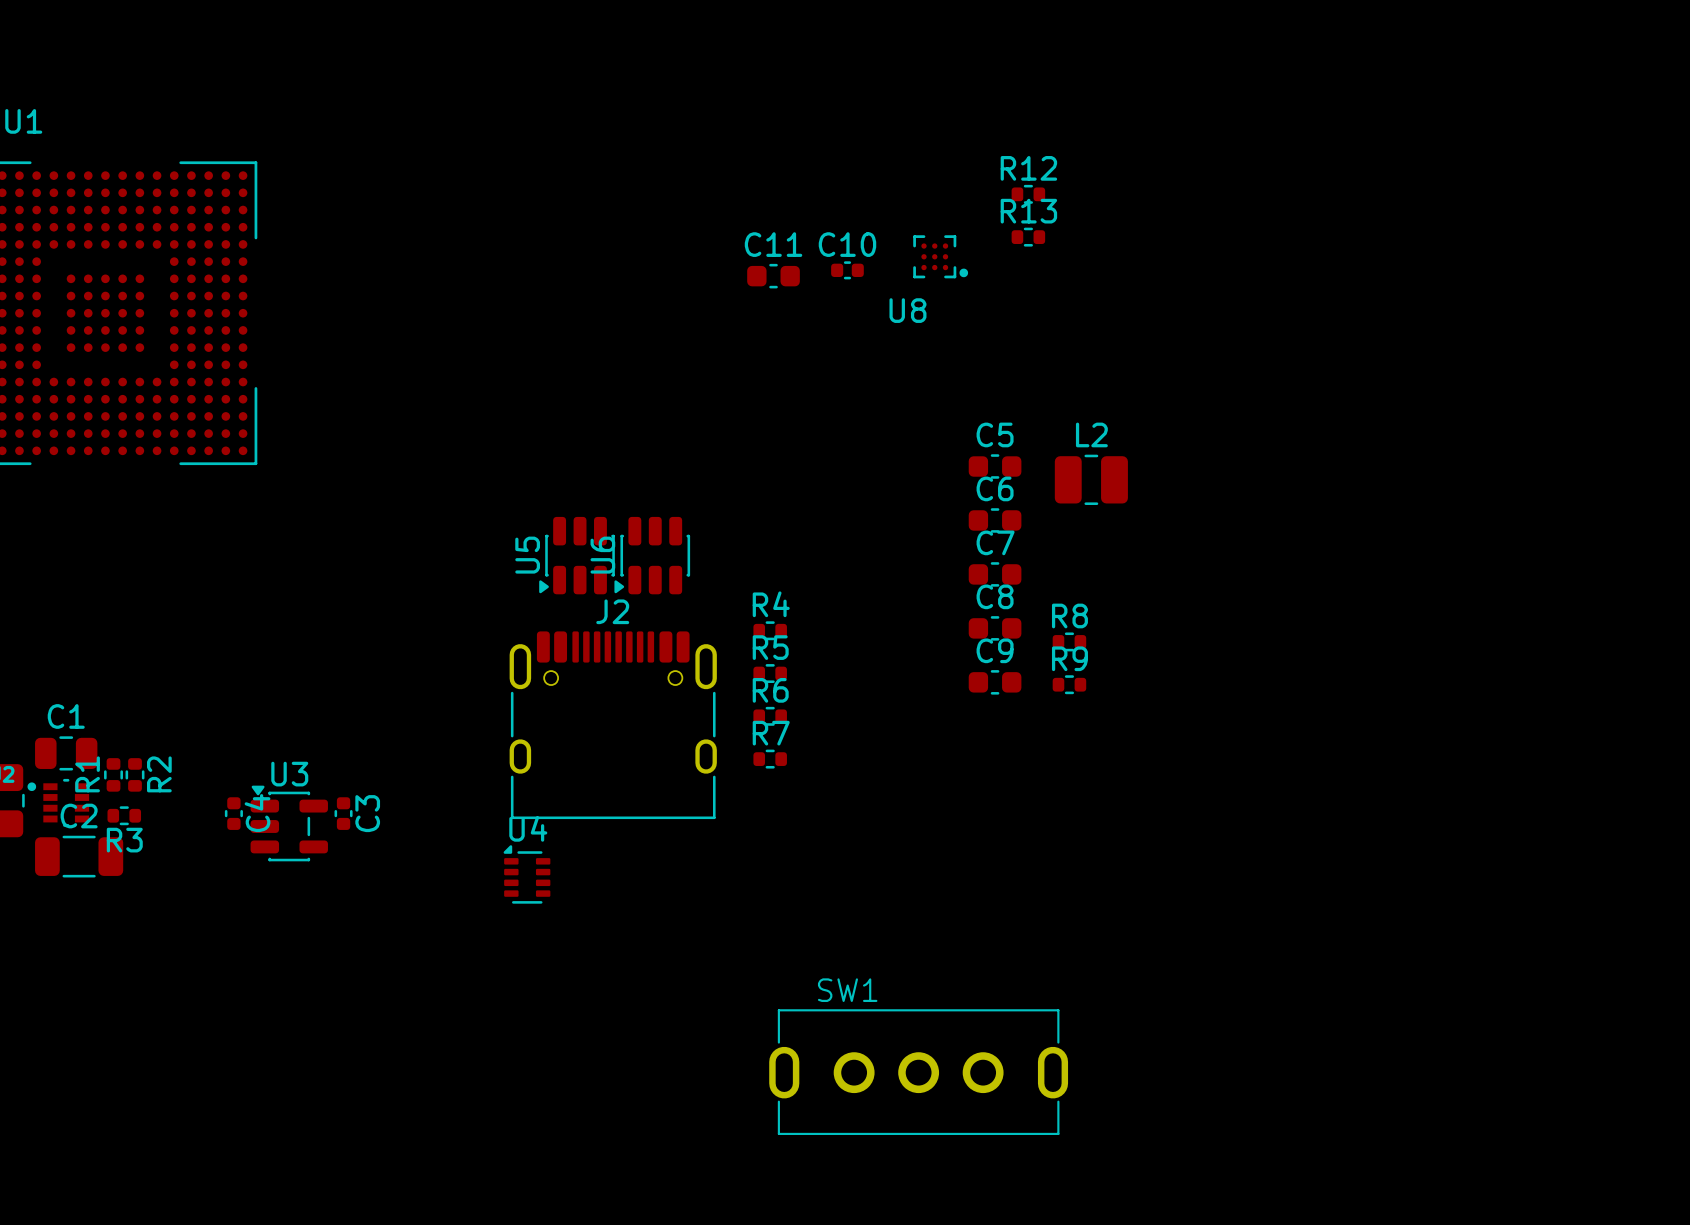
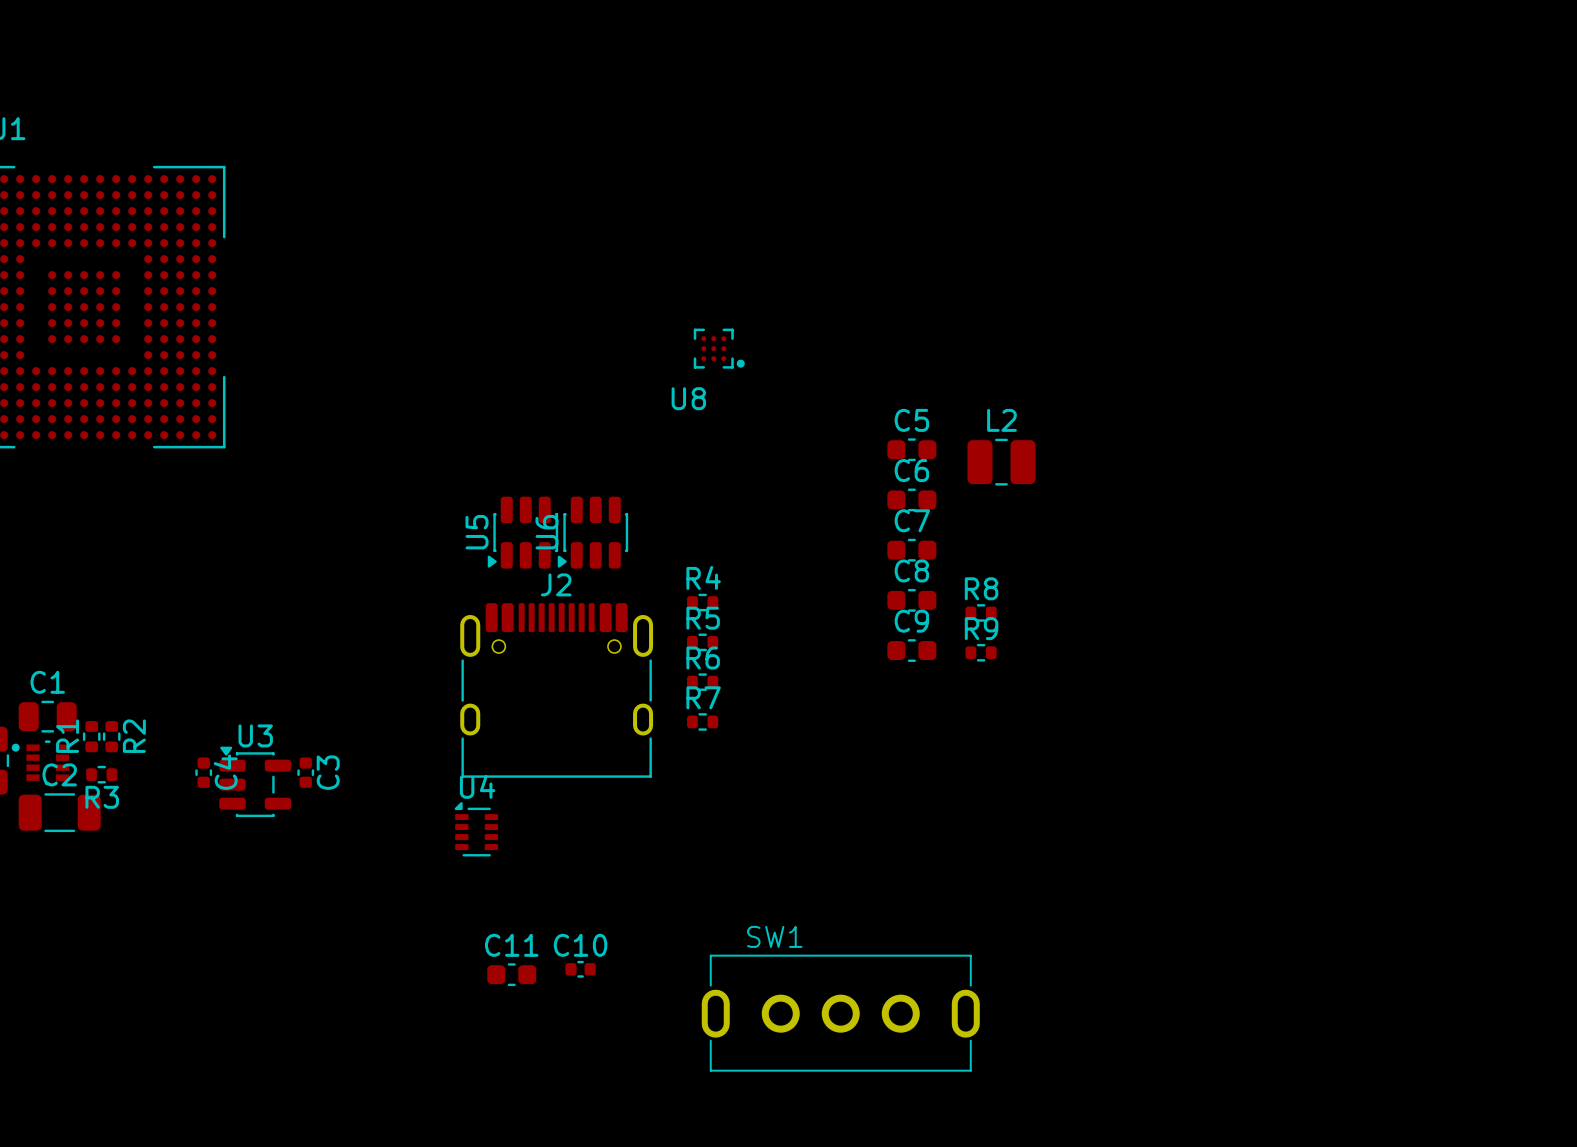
R12: (1028, 194) -> none
R13: (1028, 237) -> none
U8 position: (940, 256) -> (719, 348)
C10 position: (847, 270) -> (580, 969)
C11 position: (773, 276) -> (511, 974)

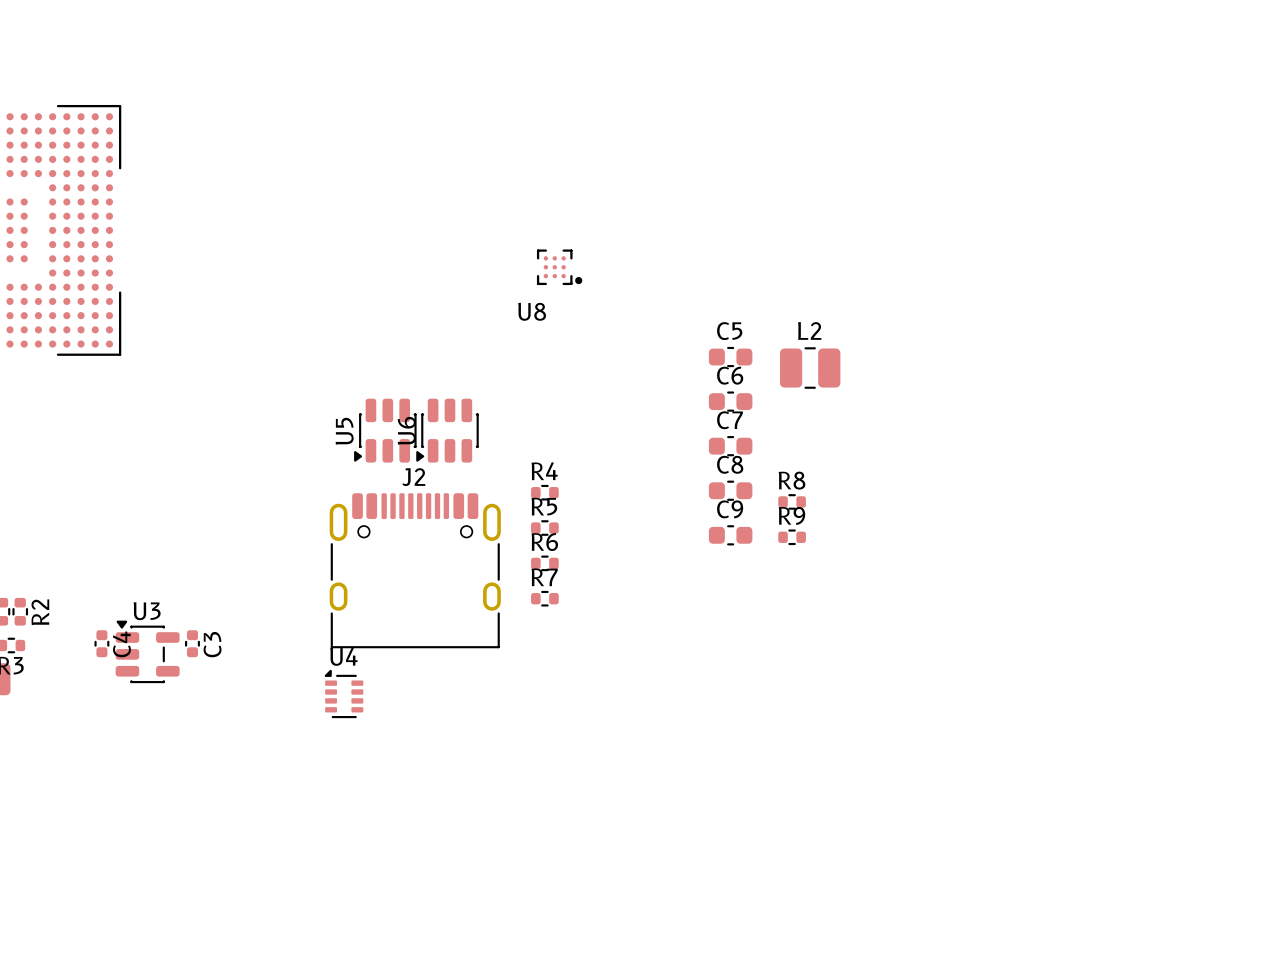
C10: (580, 969) -> none
C11: (511, 974) -> none
SW1: (840, 1013) -> none

